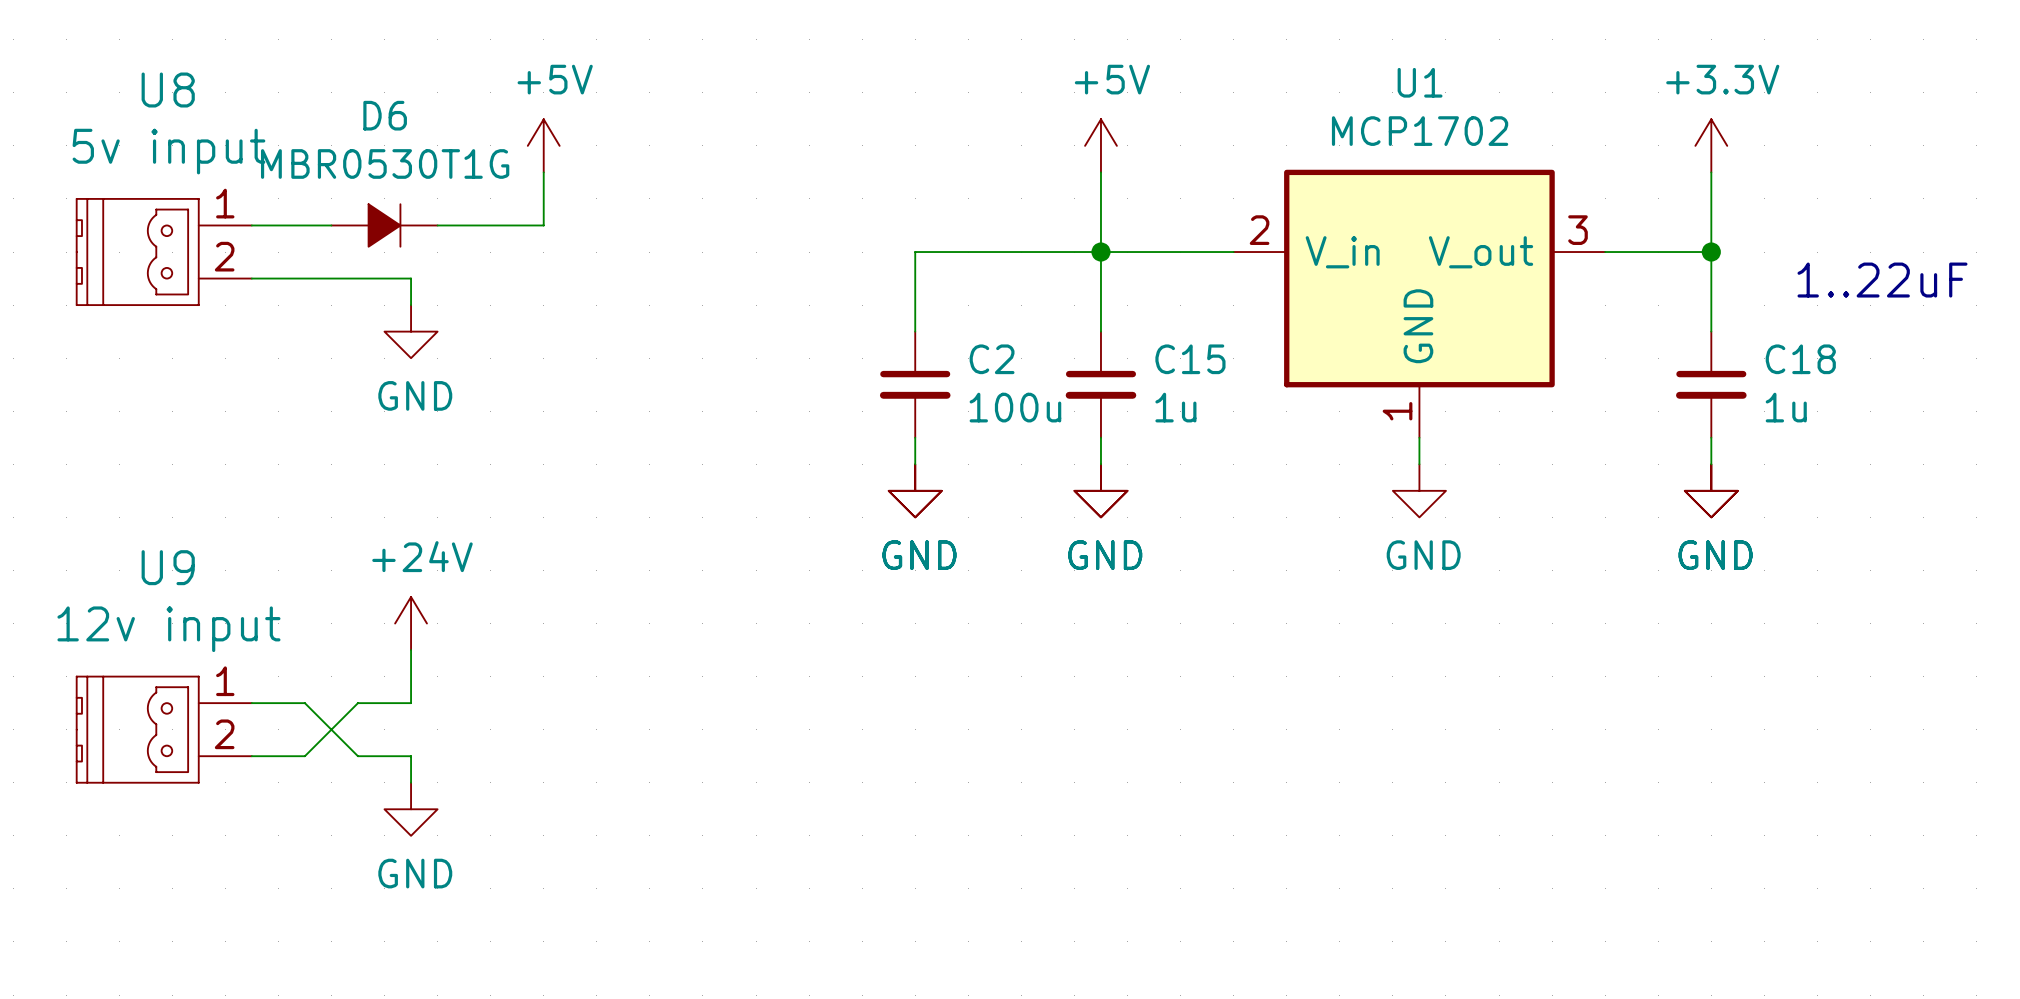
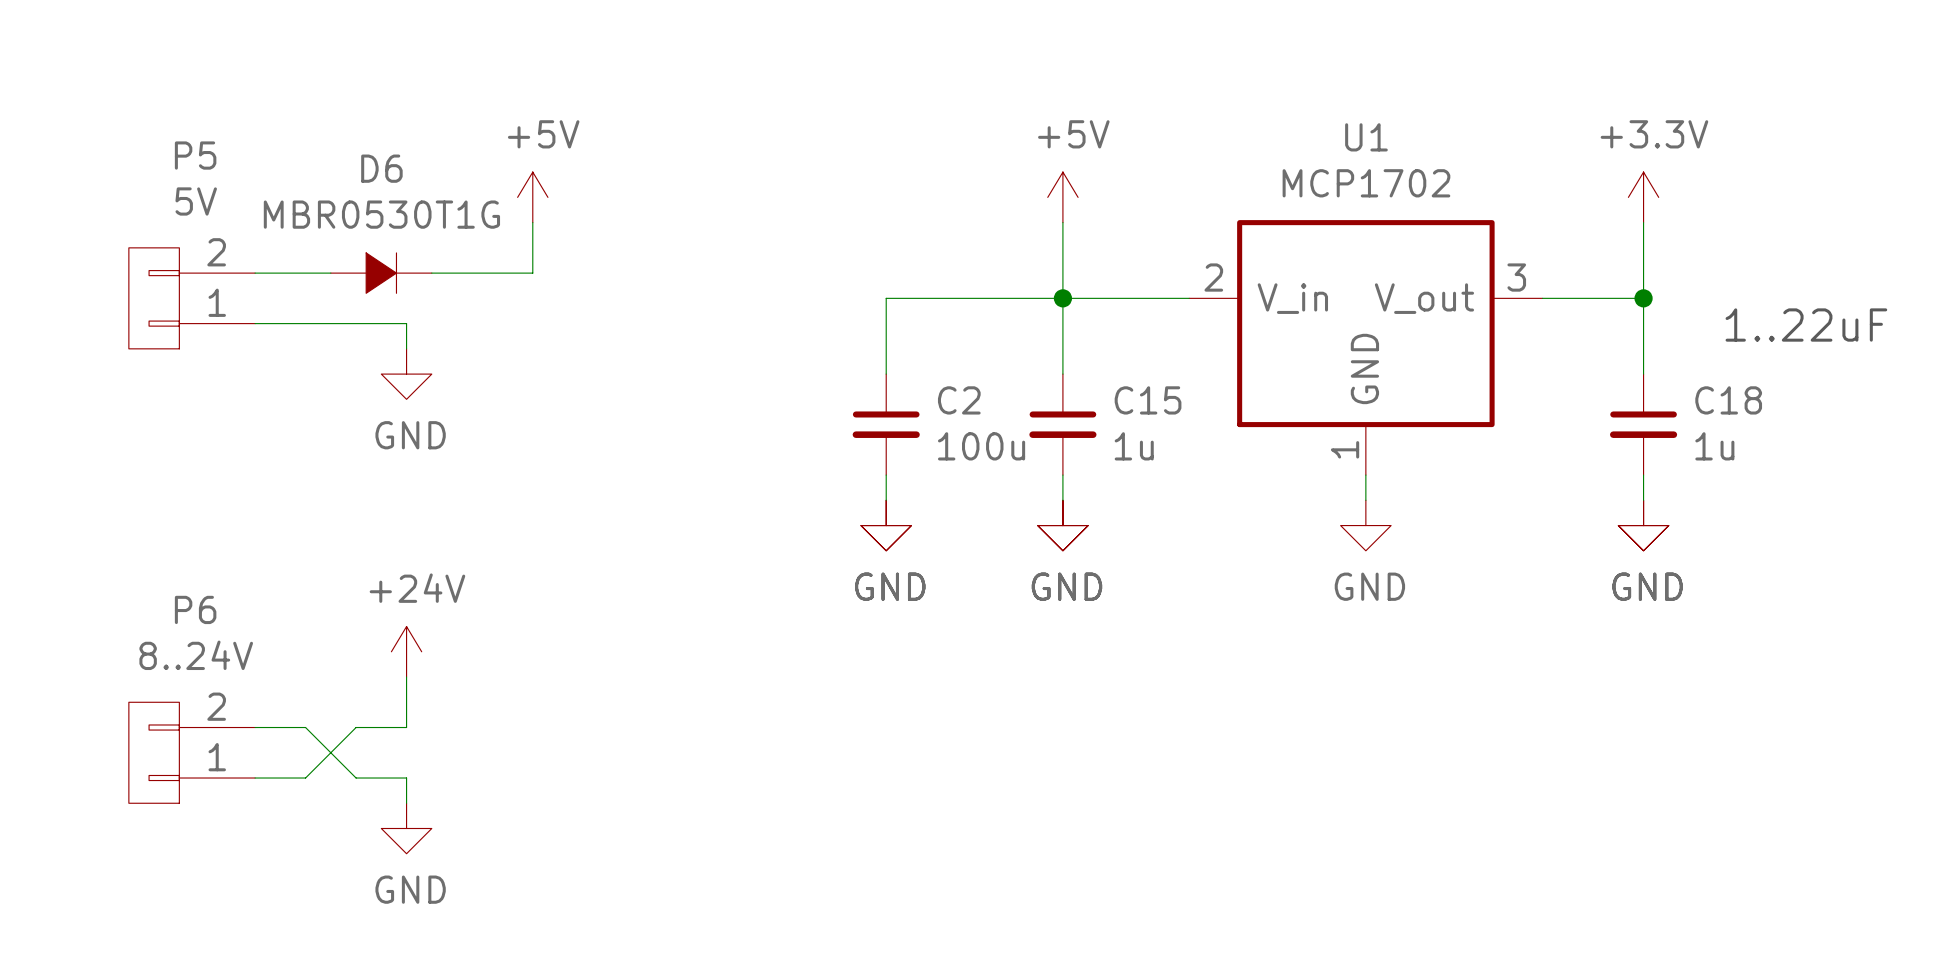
U8: 5v input (164, 252) -> none
P5: none -> 5V (191, 298)
U9: 12v input (164, 729) -> none
P6: none -> 8..24V (191, 752)

